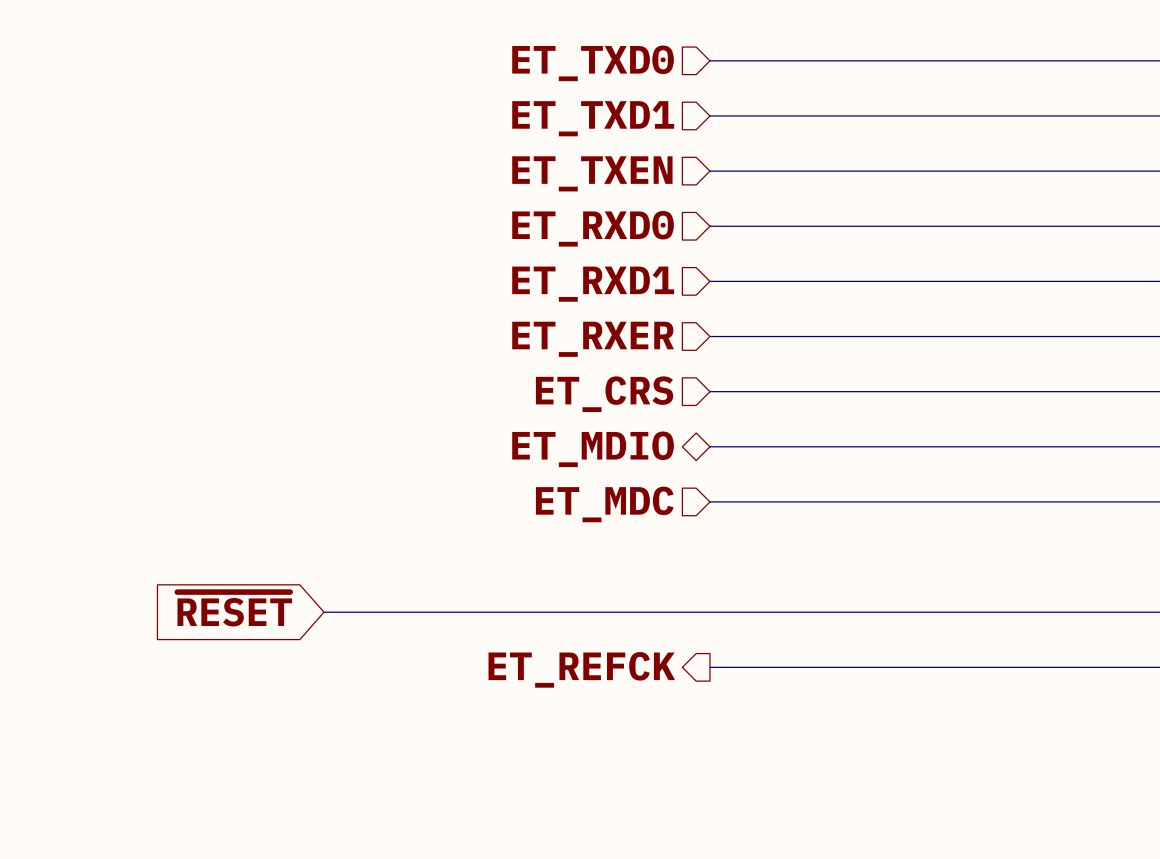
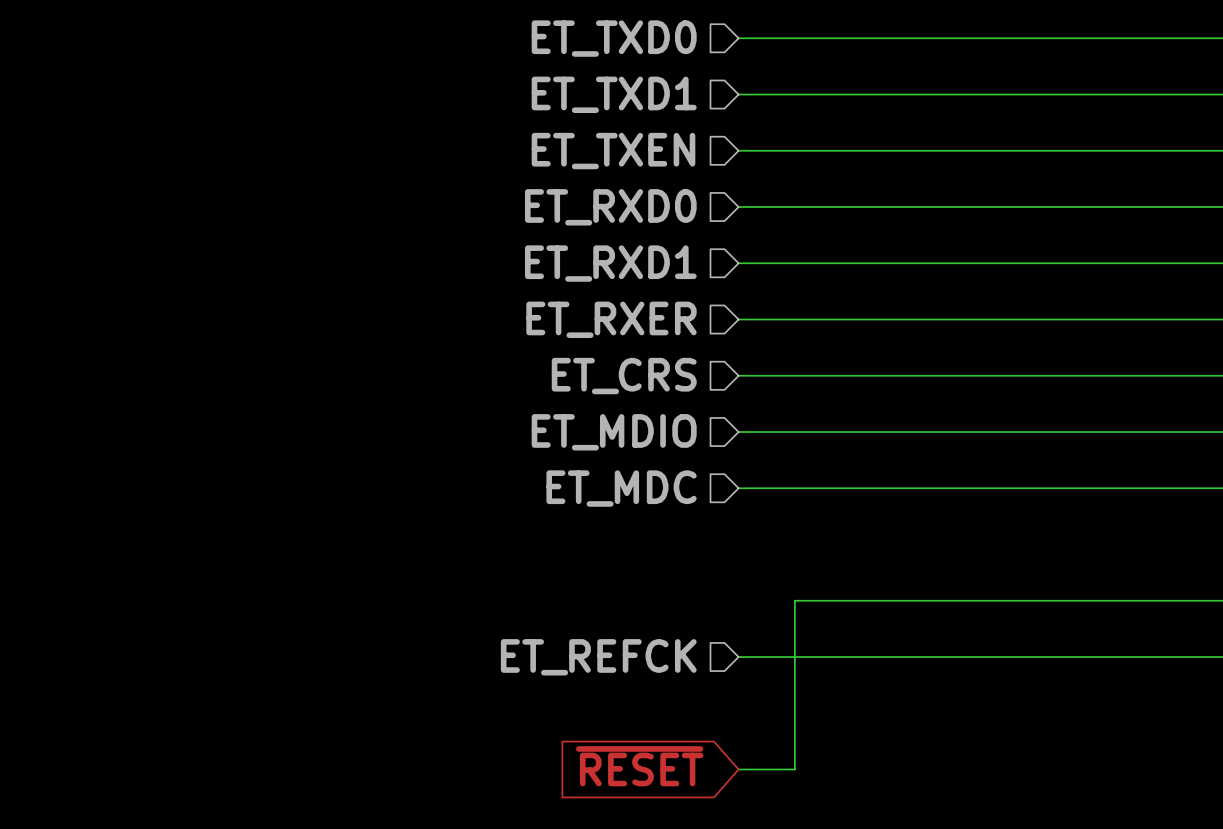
hierarchical label shape: bidirectional (593, 449) -> input (614, 432)
global label position: ~{RESET} (234, 609) -> ~{RESET} (639, 766)
wire: (324, 612) (765, 612) -> (738, 769) (794, 769) (794, 600)
hierarchical label shape: output (581, 669) -> input (598, 657)

